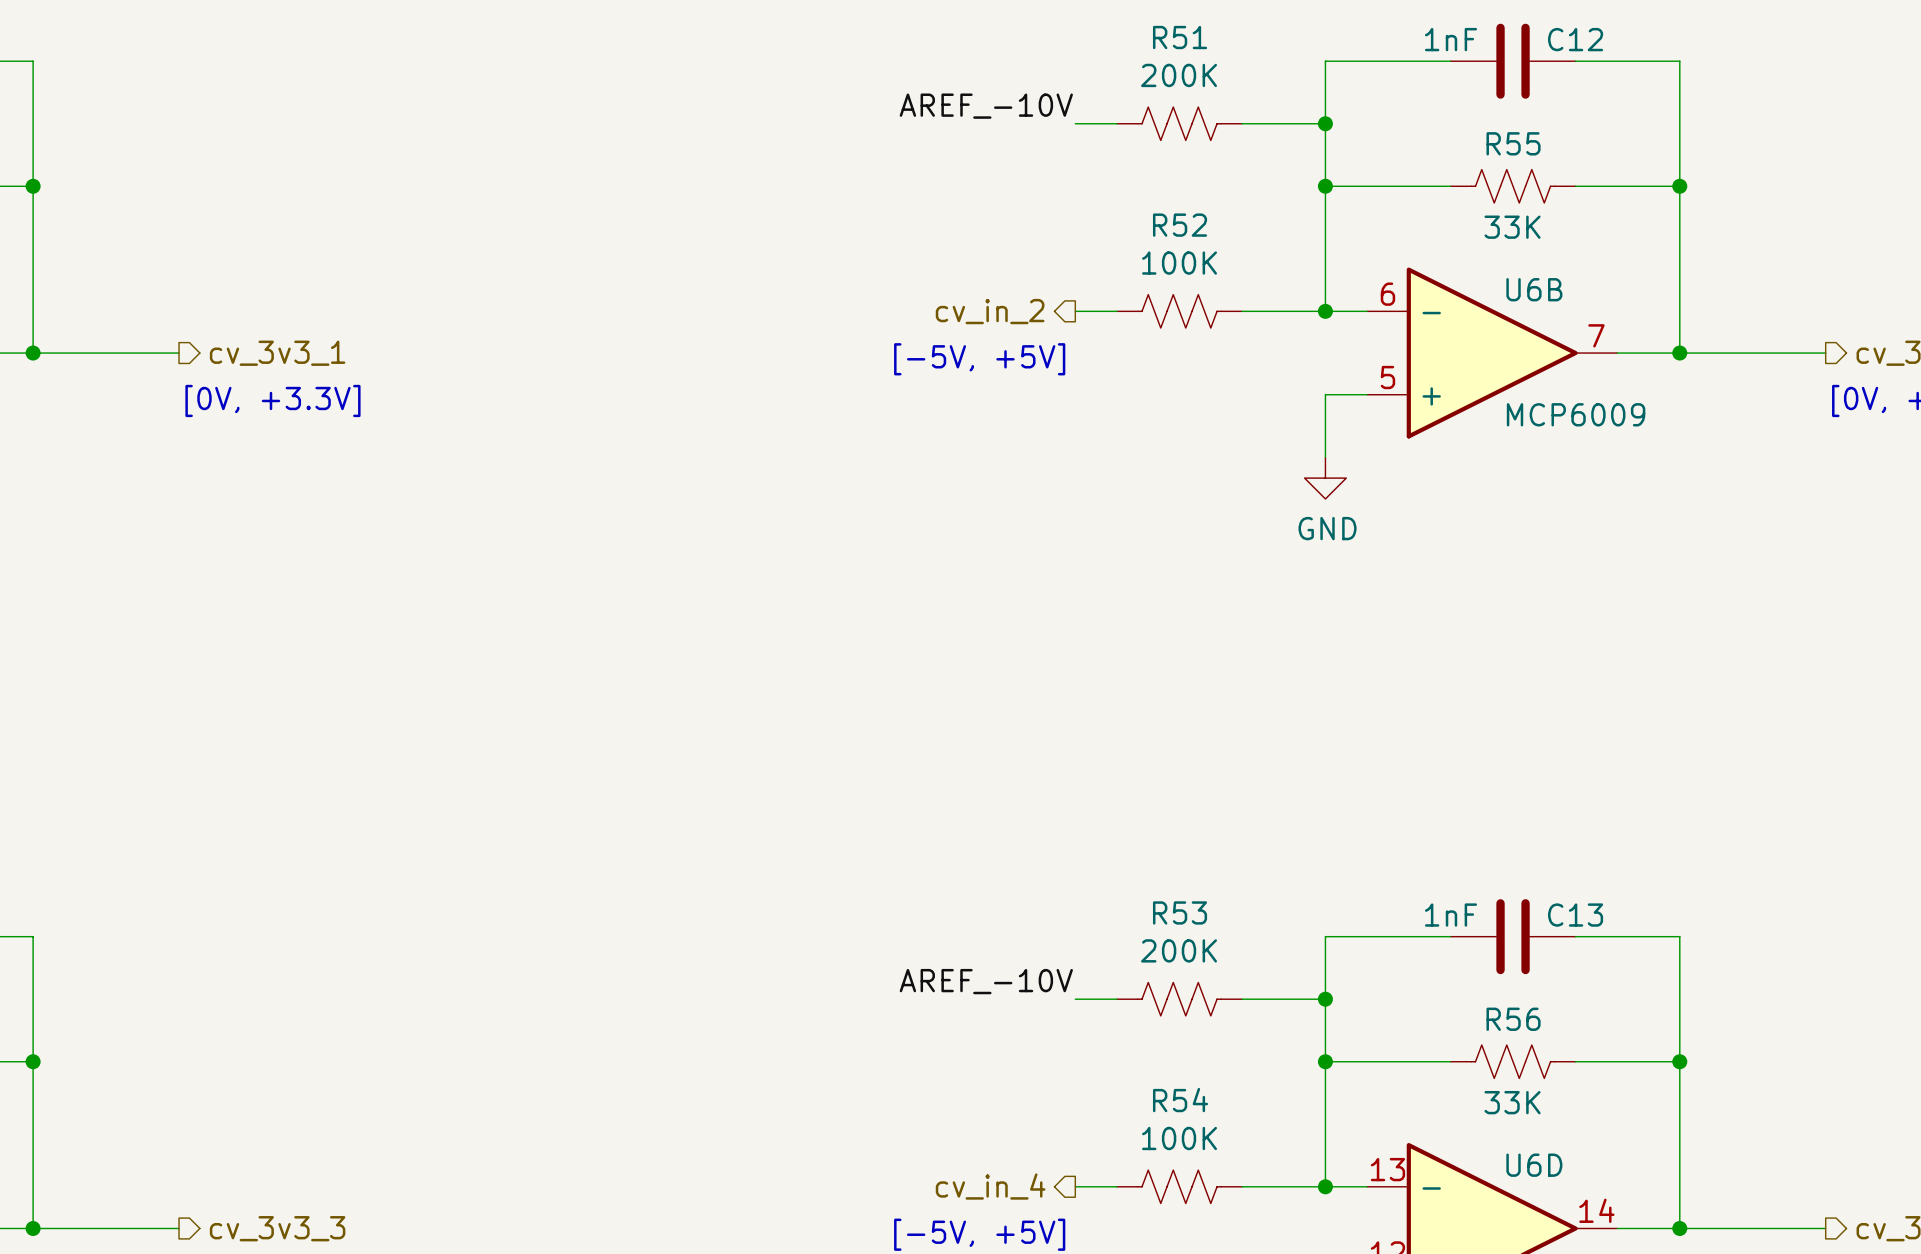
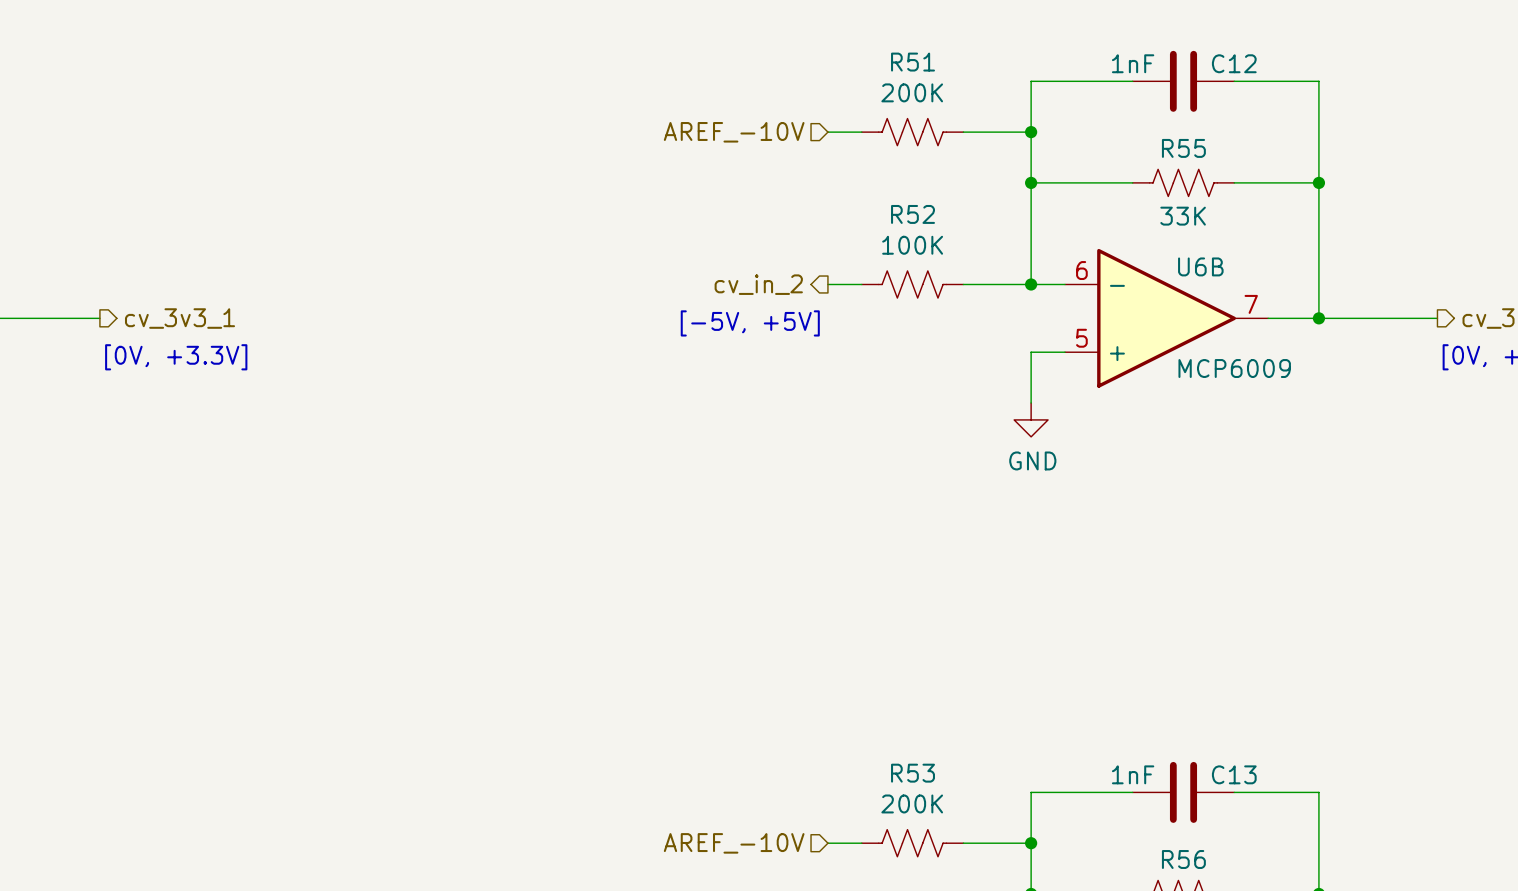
label: AREF_-10V (986, 106) -> none
hierarchical label: none -> AREF_-10V (734, 132)
label: AREF_-10V (986, 981) -> none
hierarchical label: none -> AREF_-10V (734, 843)

